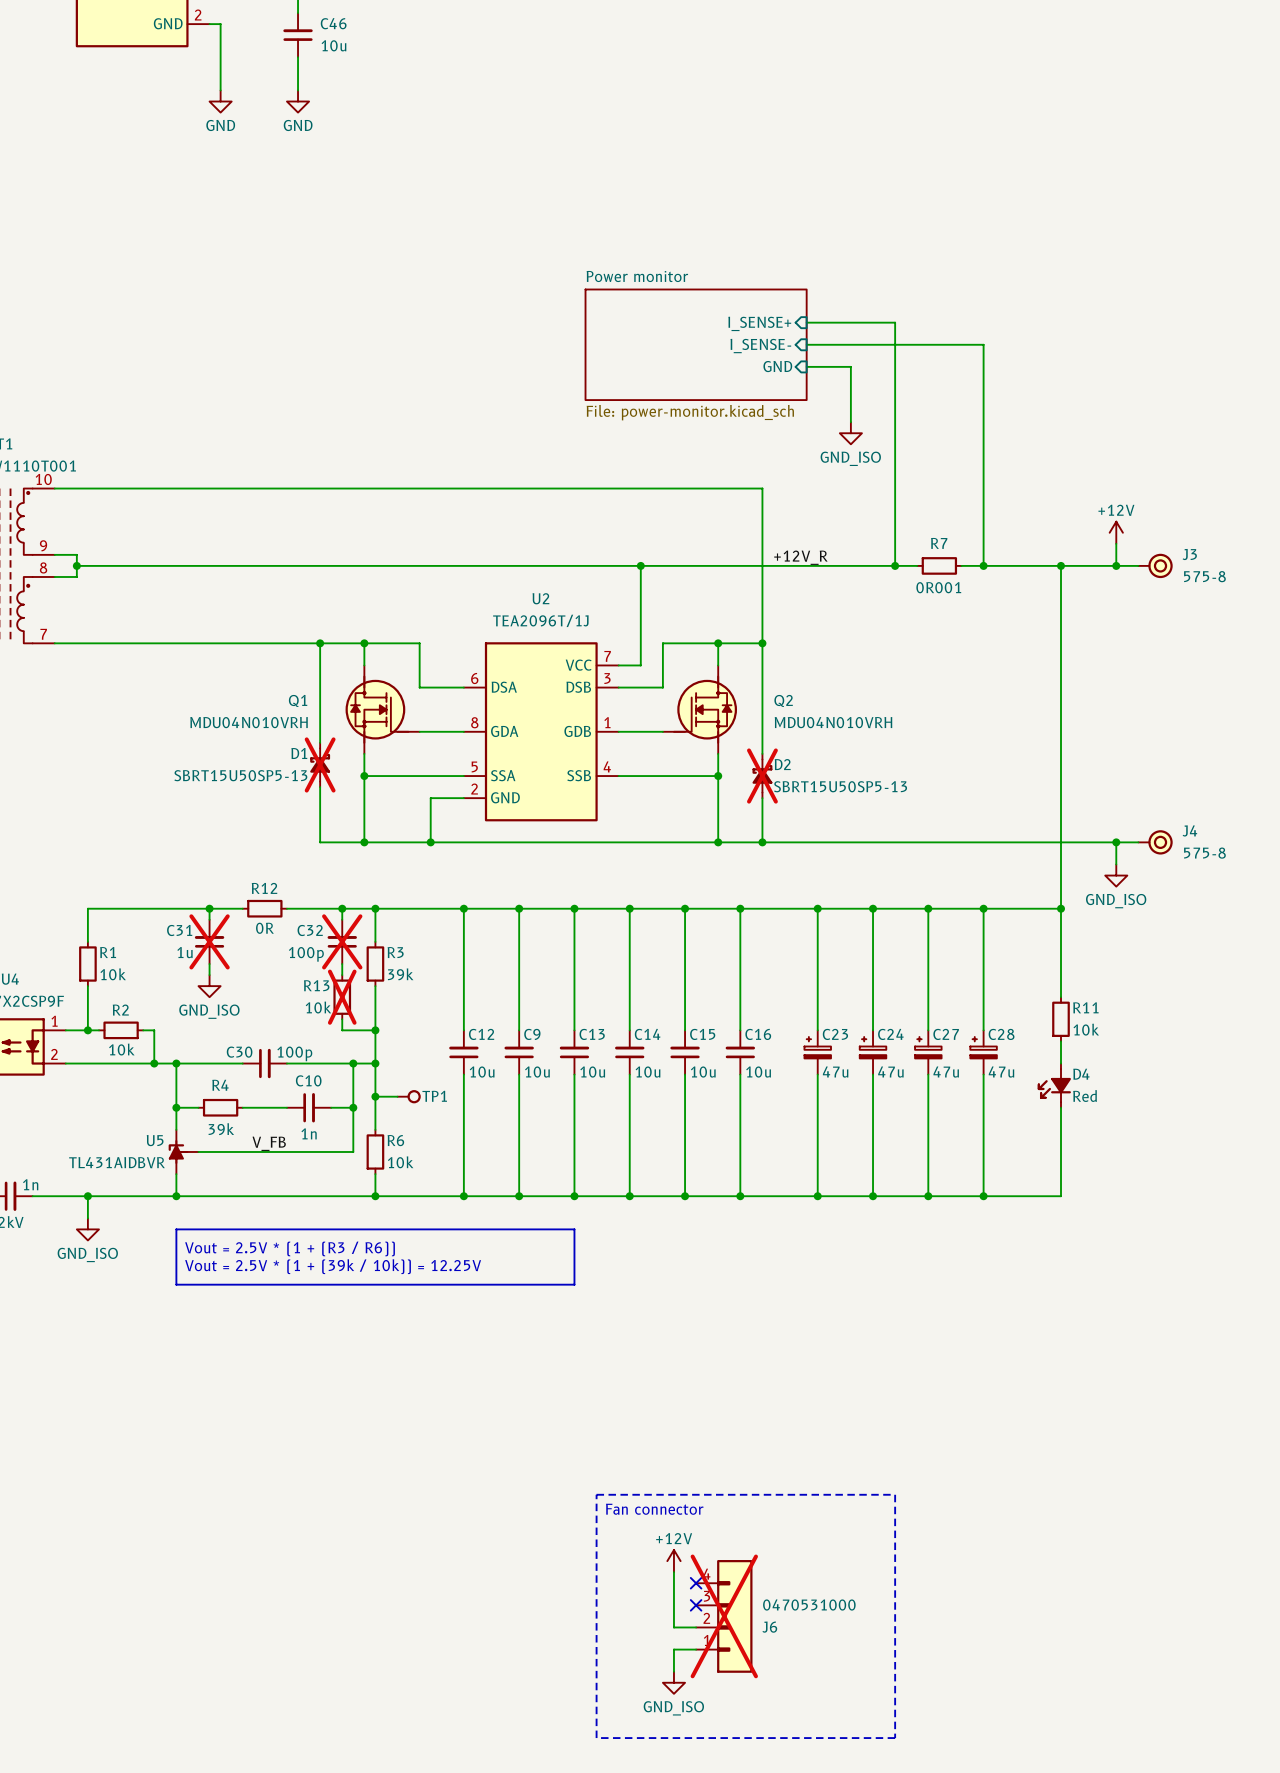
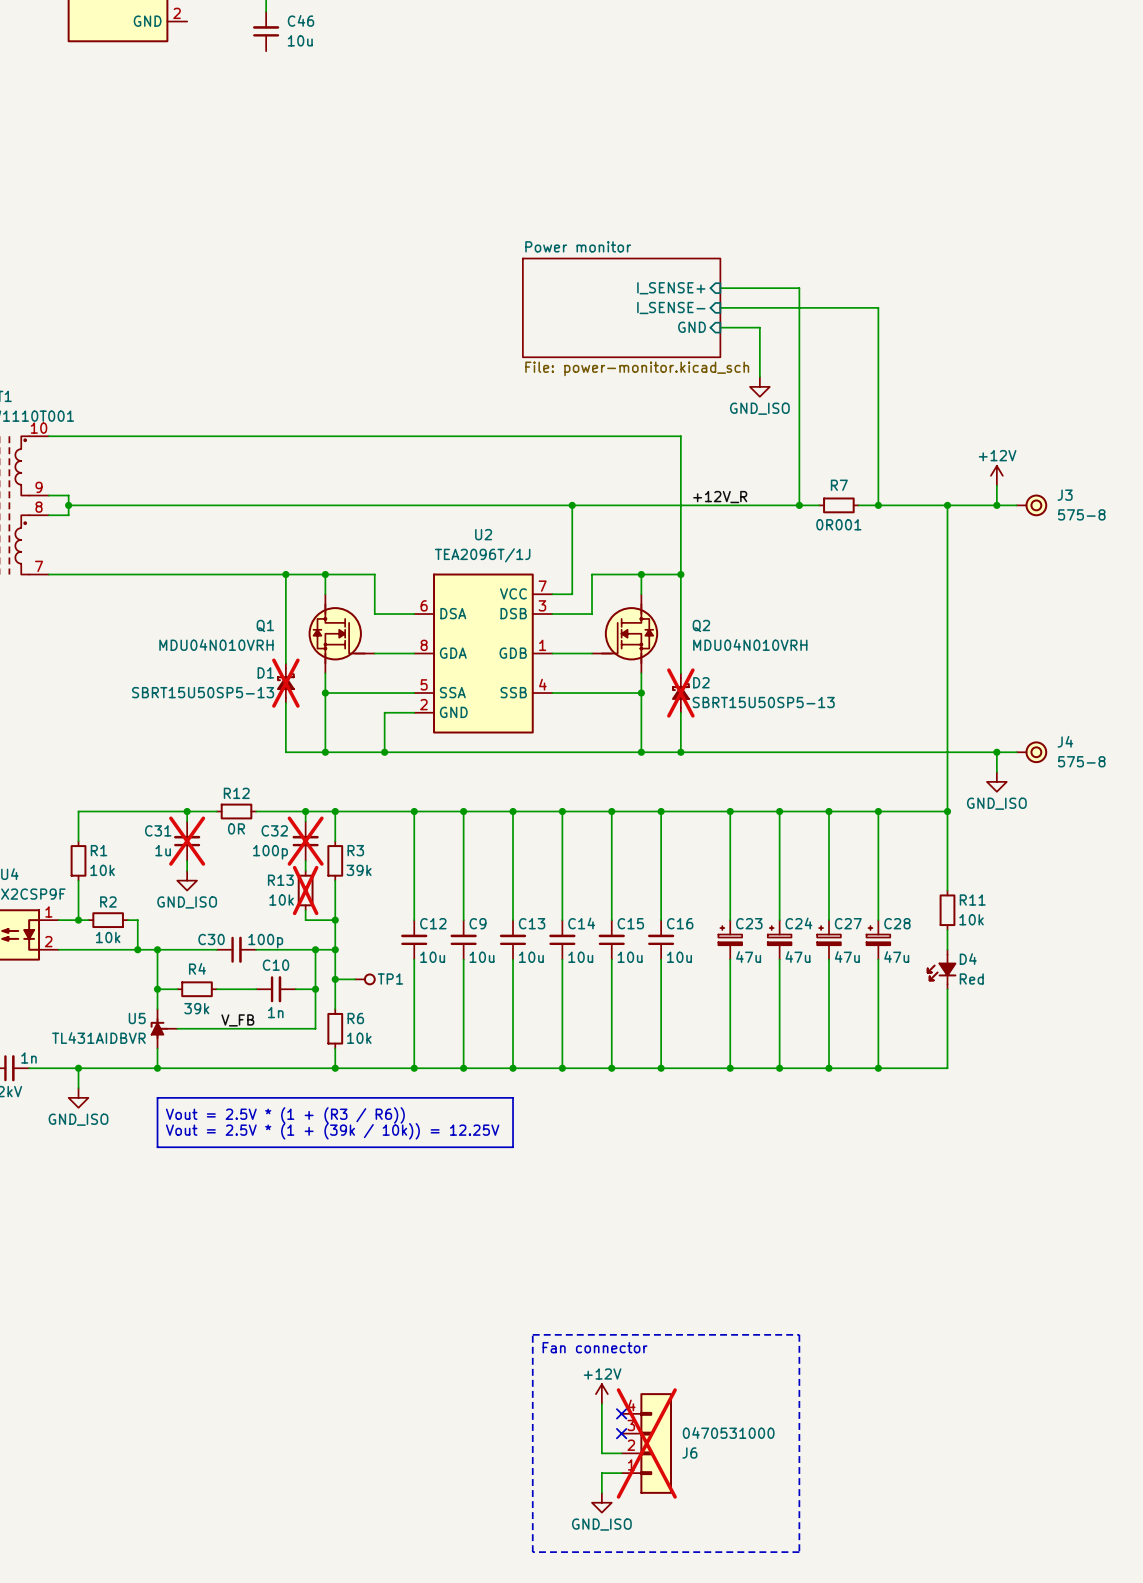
wire: (209, 24) (220, 24) (220, 90) -> none
wire: (298, 57) (298, 90) -> none
power symbol: GND (220, 101) -> none
power symbol: GND (298, 101) -> none

